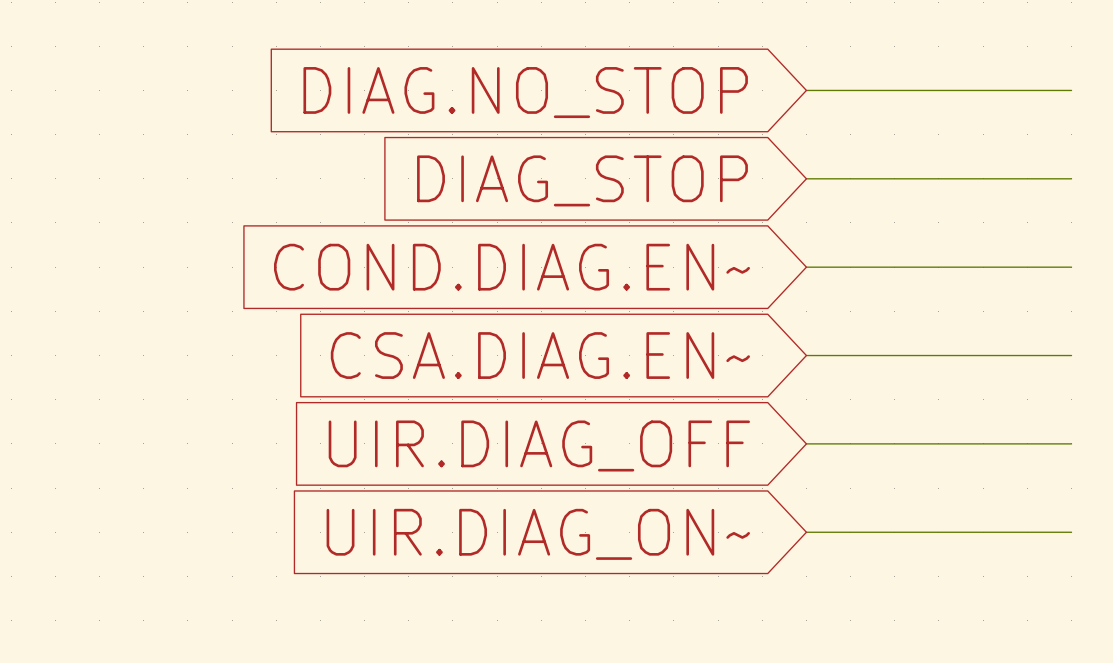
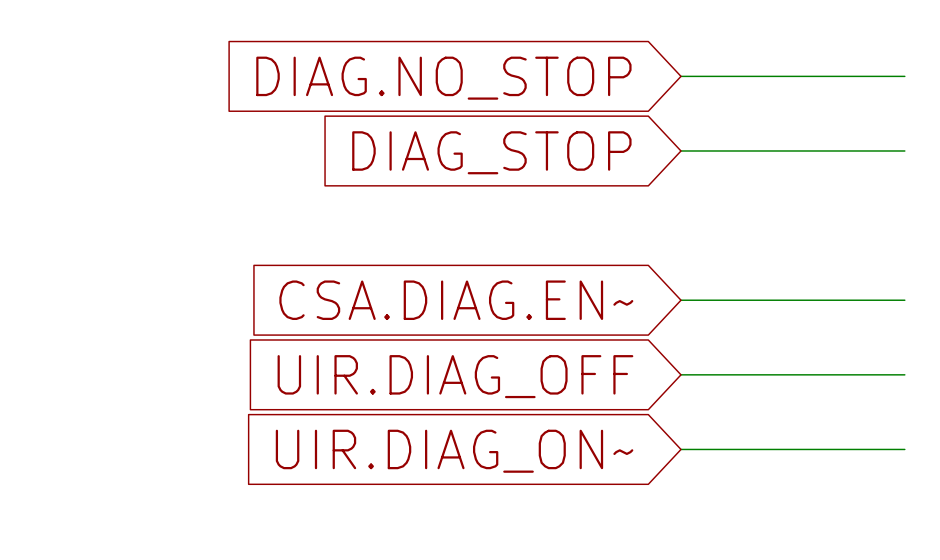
global label: COND.DIAG.EN~ (512, 267) -> none
wire: (806, 267) (1071, 267) -> none

